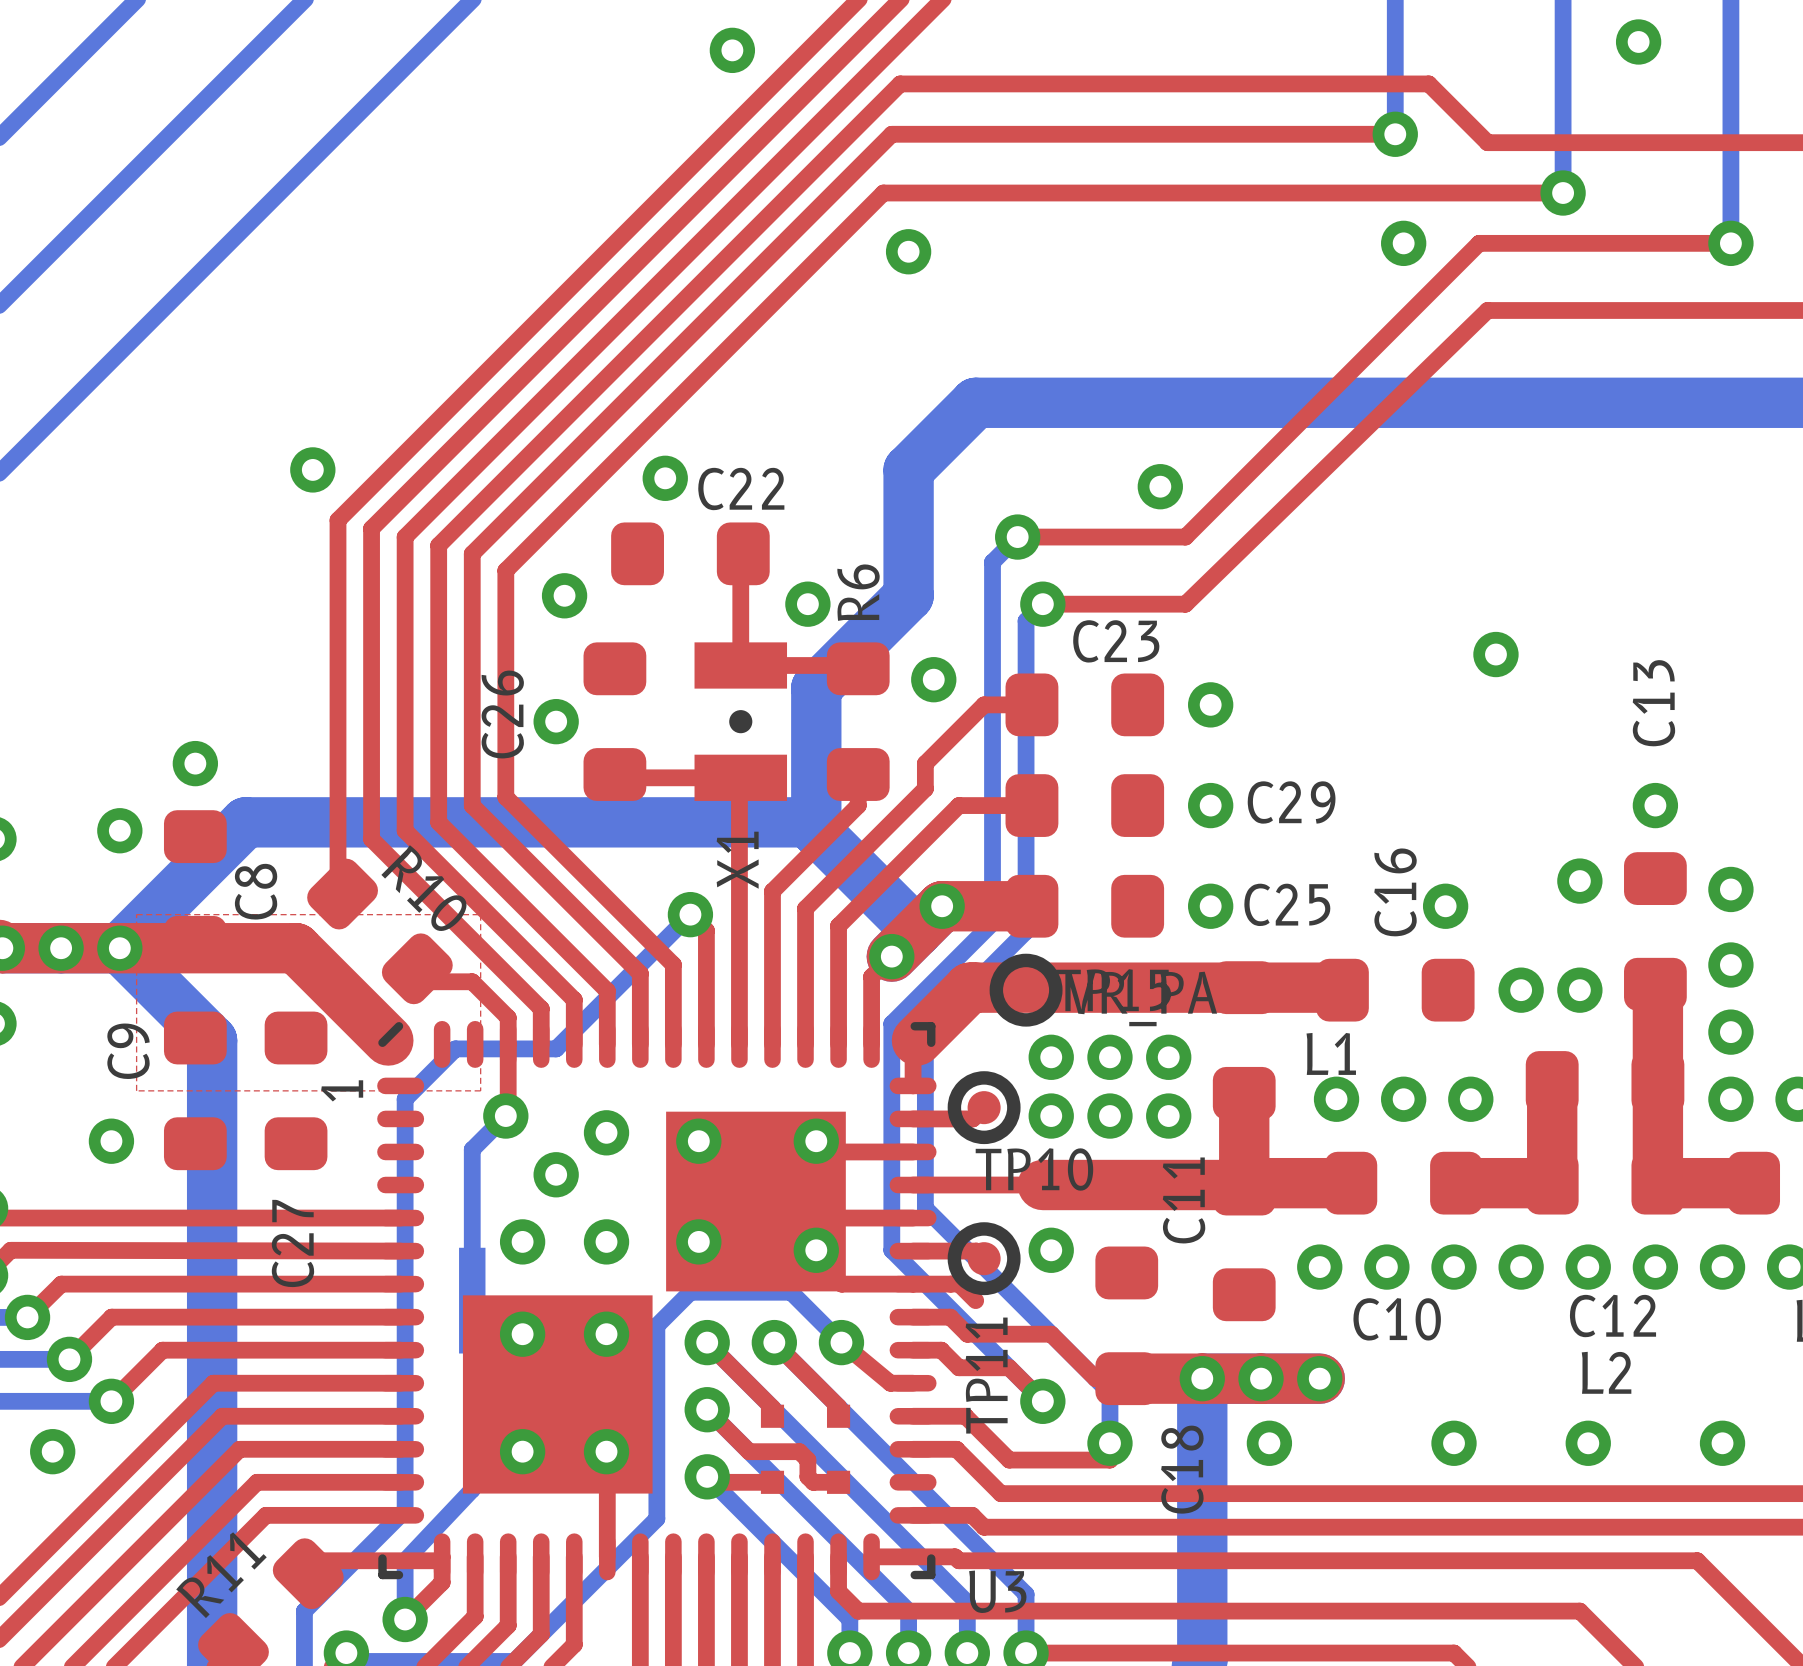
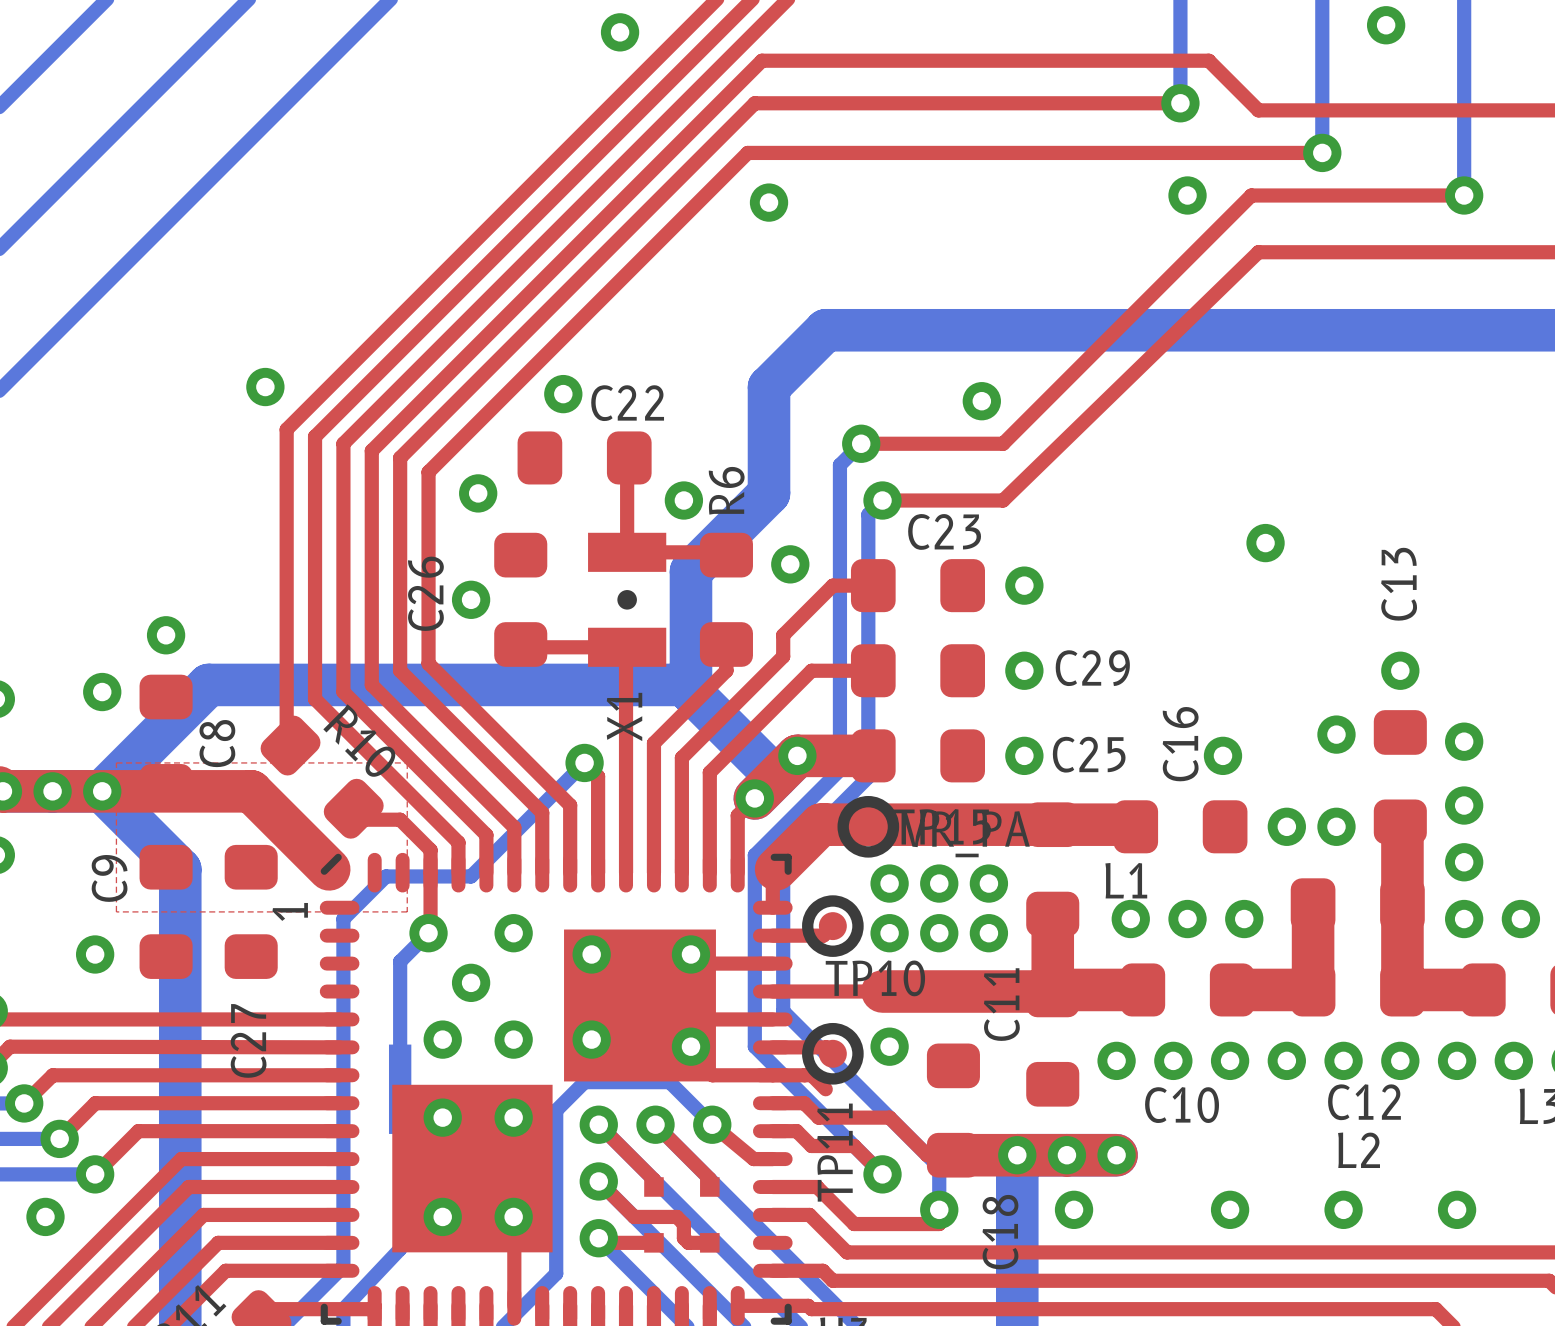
via position: (606, 1132) -> (513, 933)

